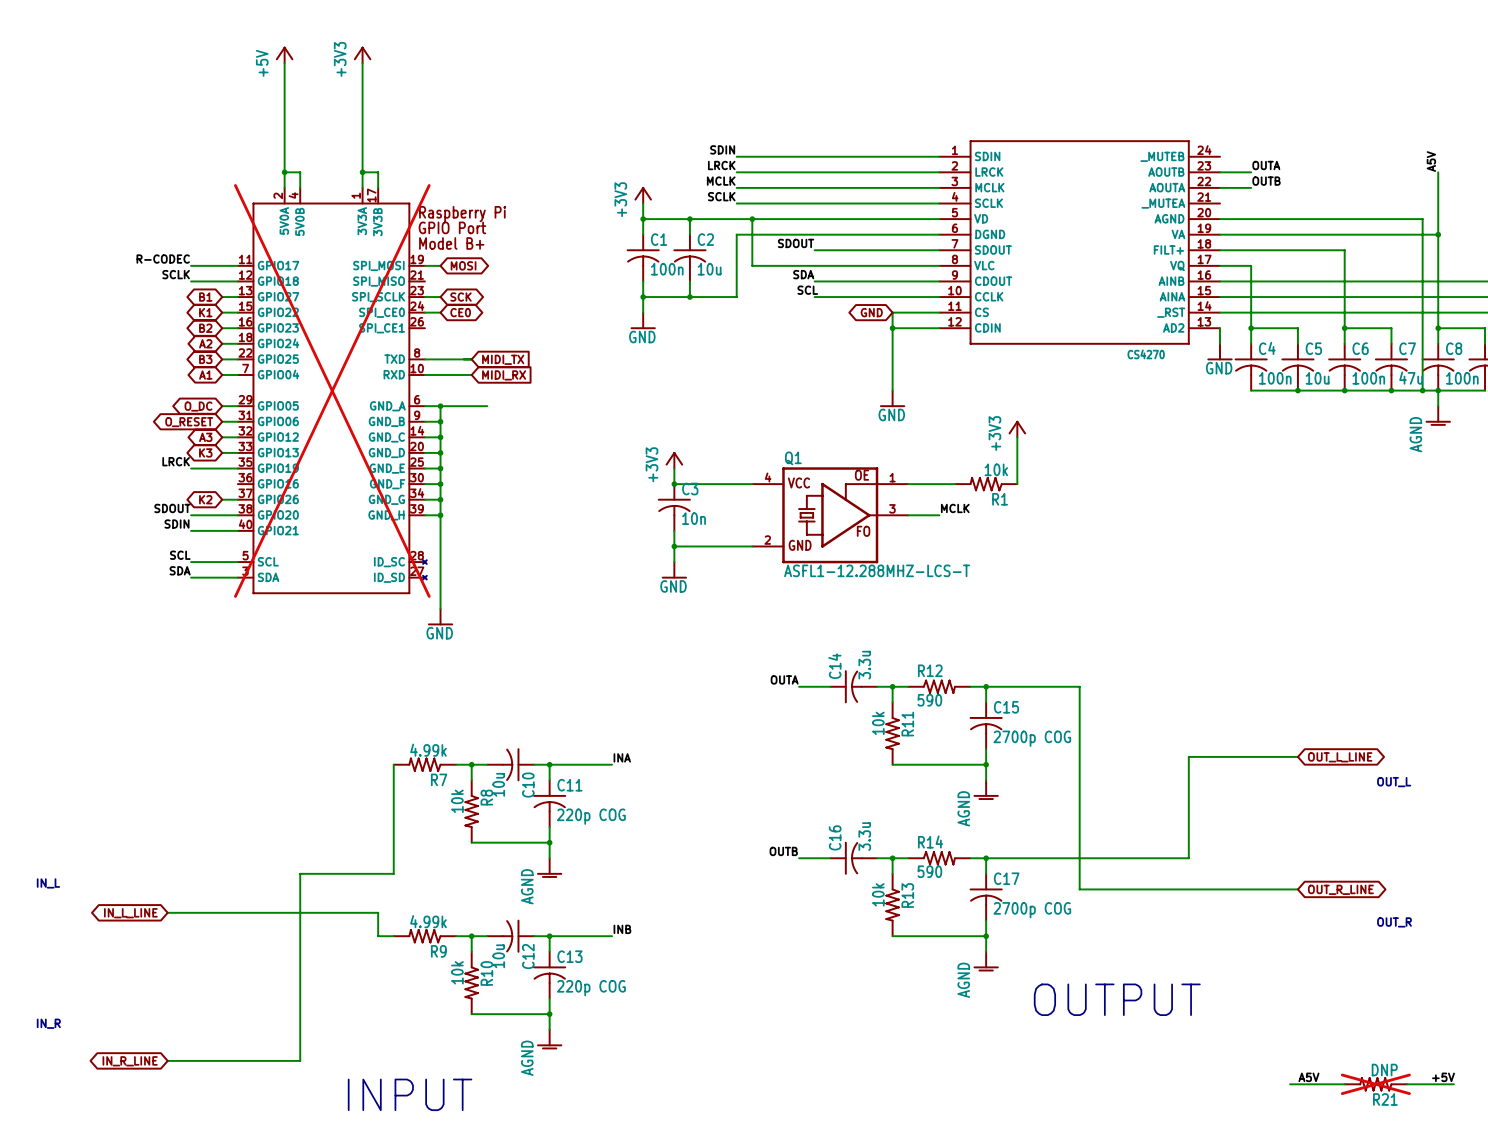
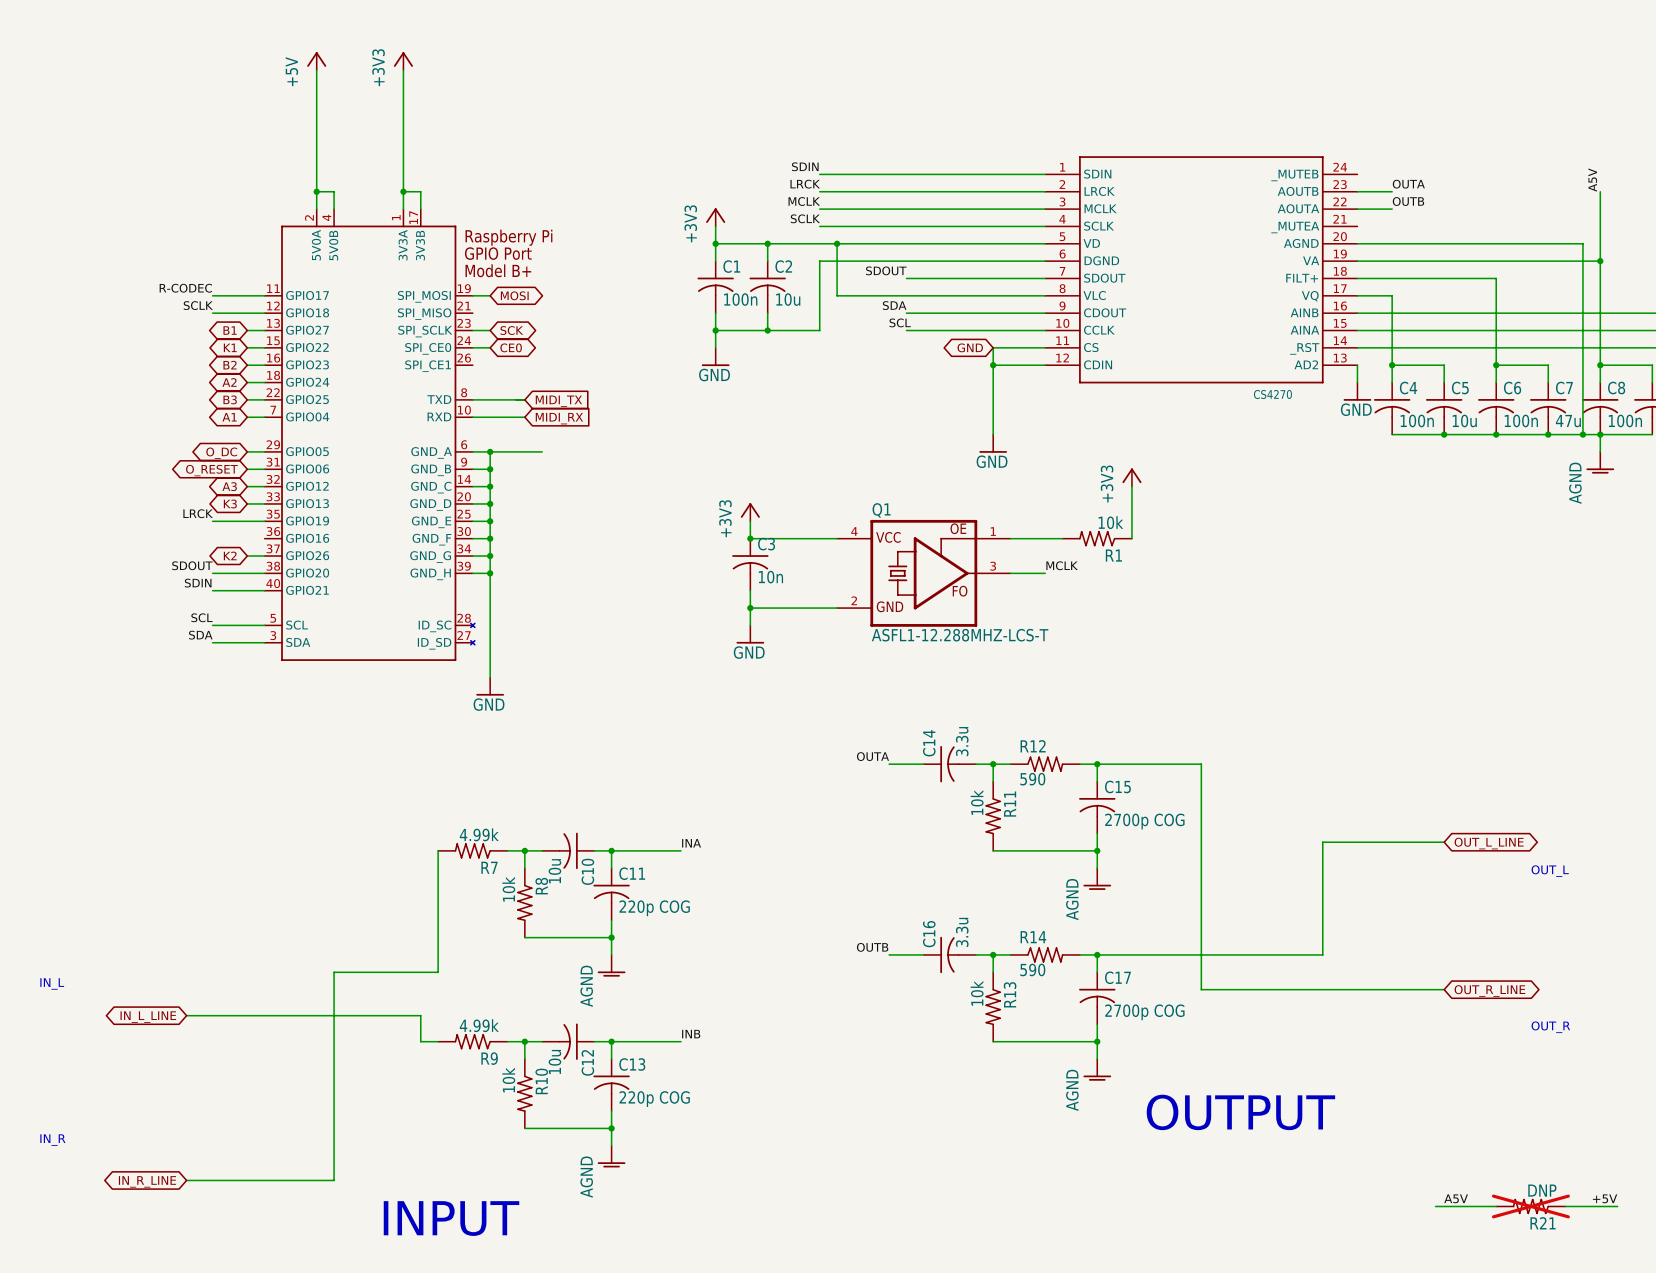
part do-not-place cross: (332, 390) -> none

